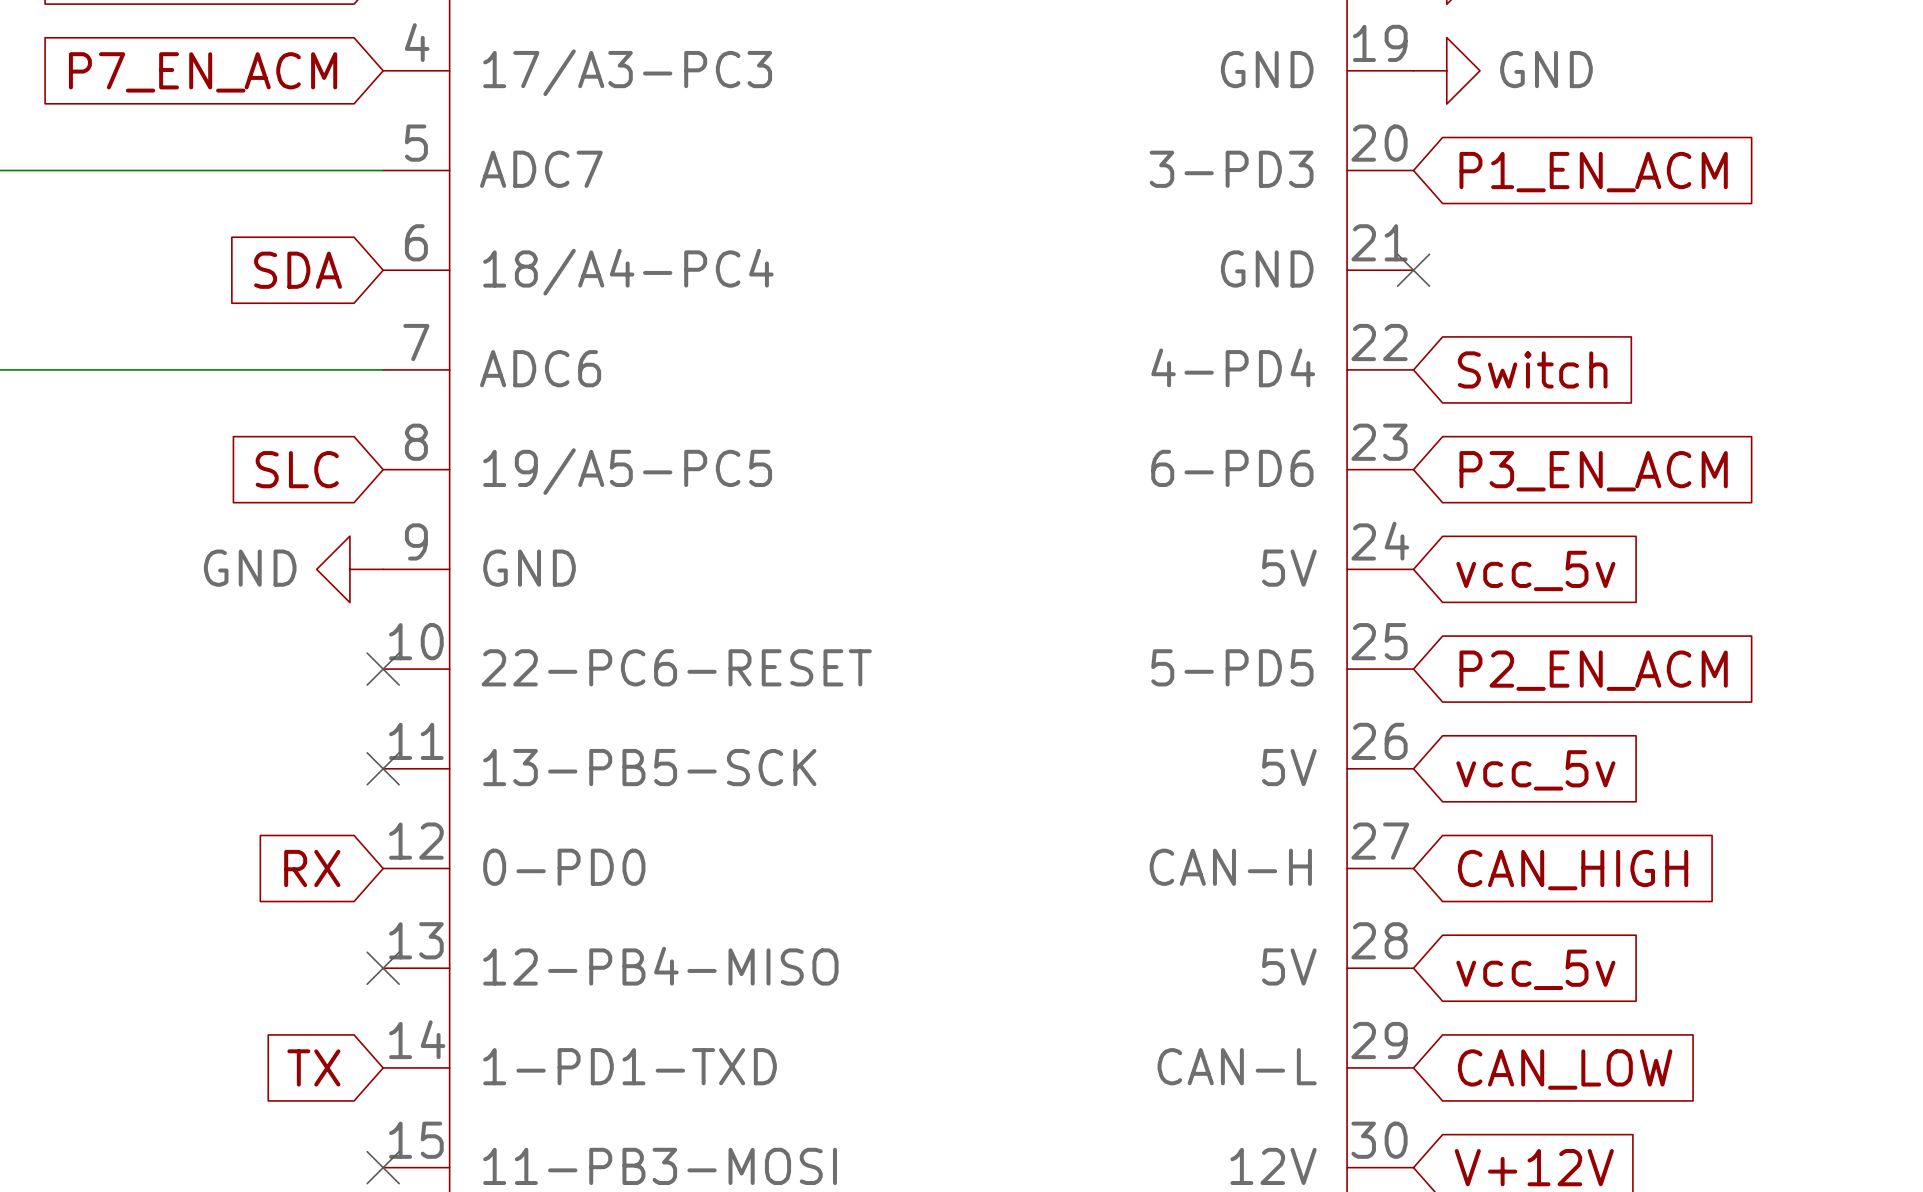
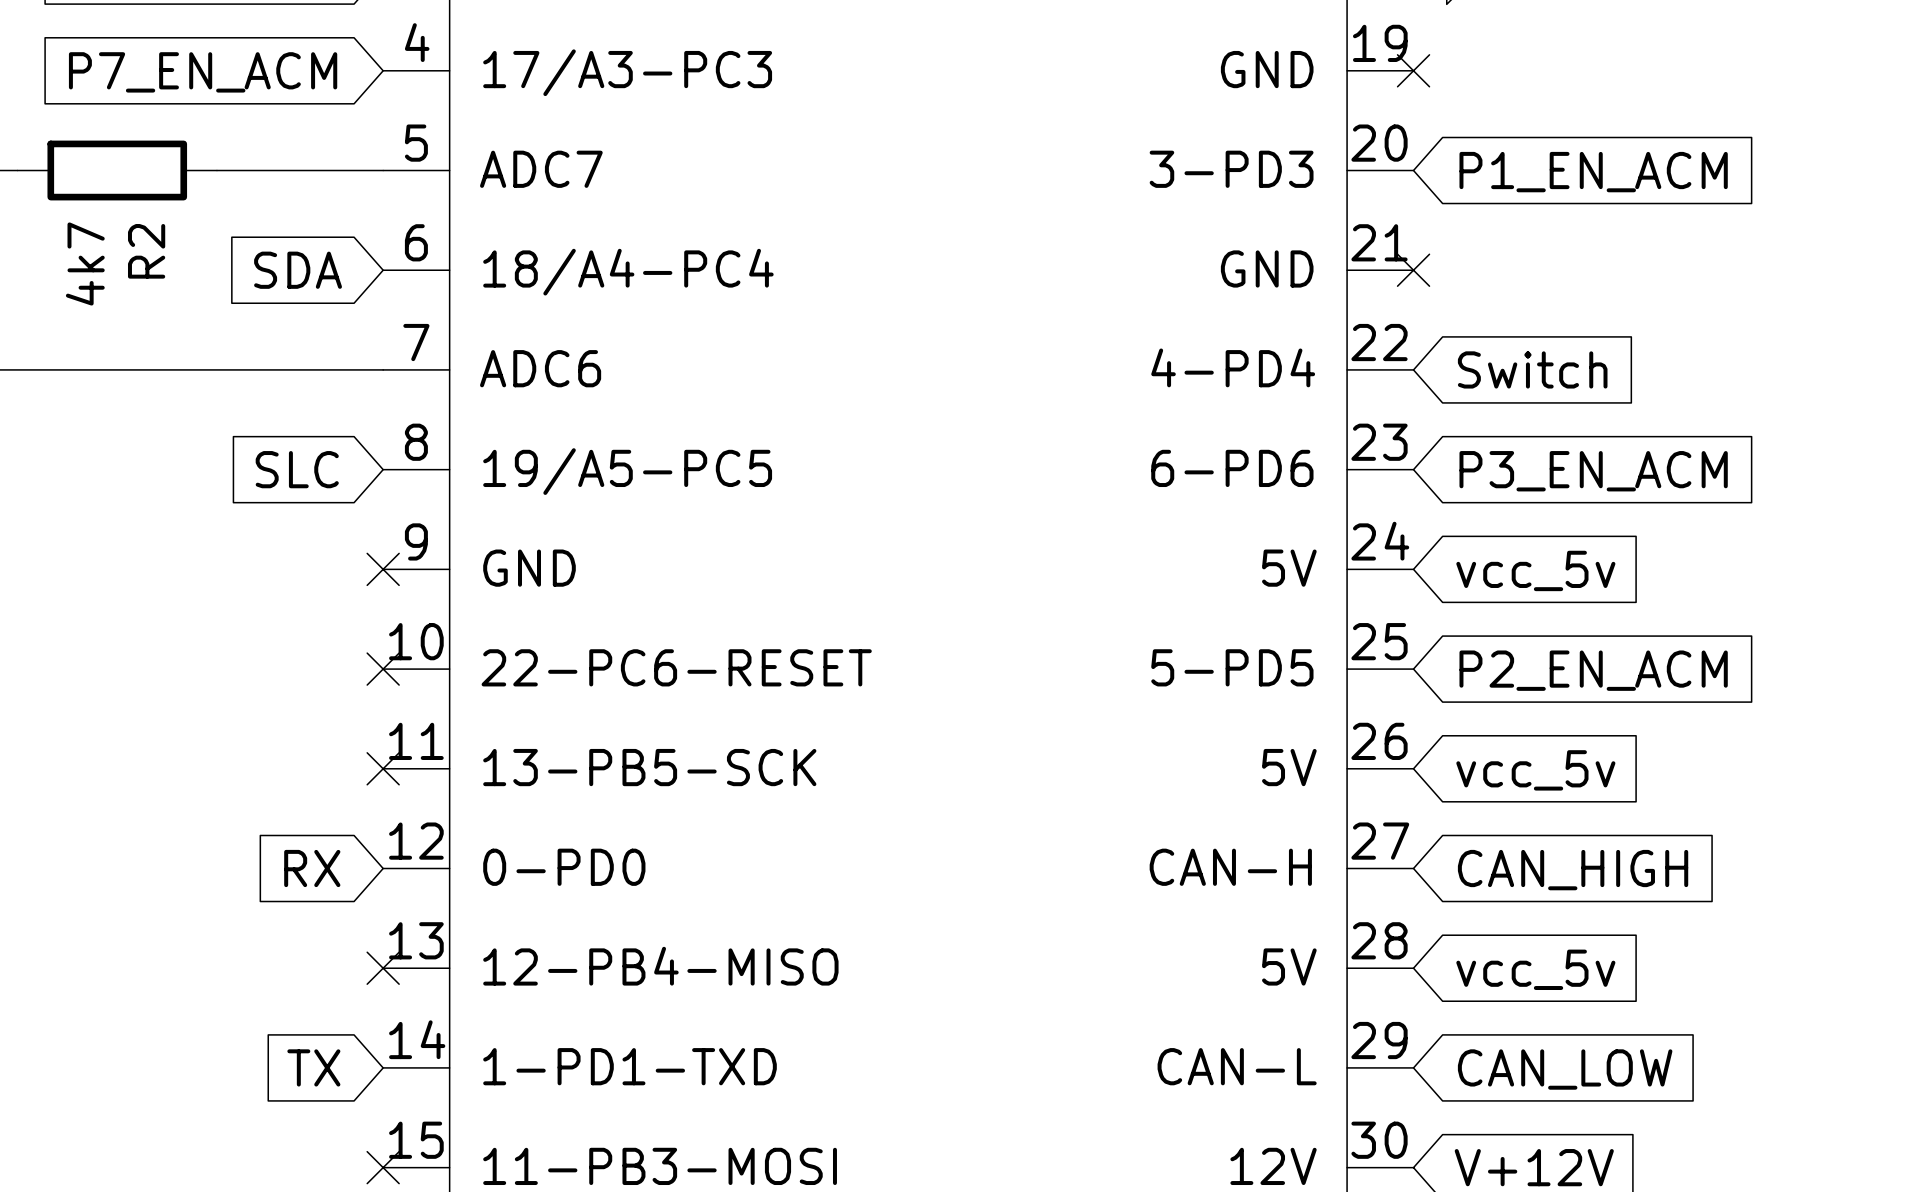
no-connect mark: none -> (1413, 70)
power symbol: GND (1446, 70) -> none
wire: (17, 170) (216, 170) -> none
R2: none -> 4k7 (117, 170)
power symbol: GND (349, 569) -> none
no-connect mark: none -> (383, 569)

